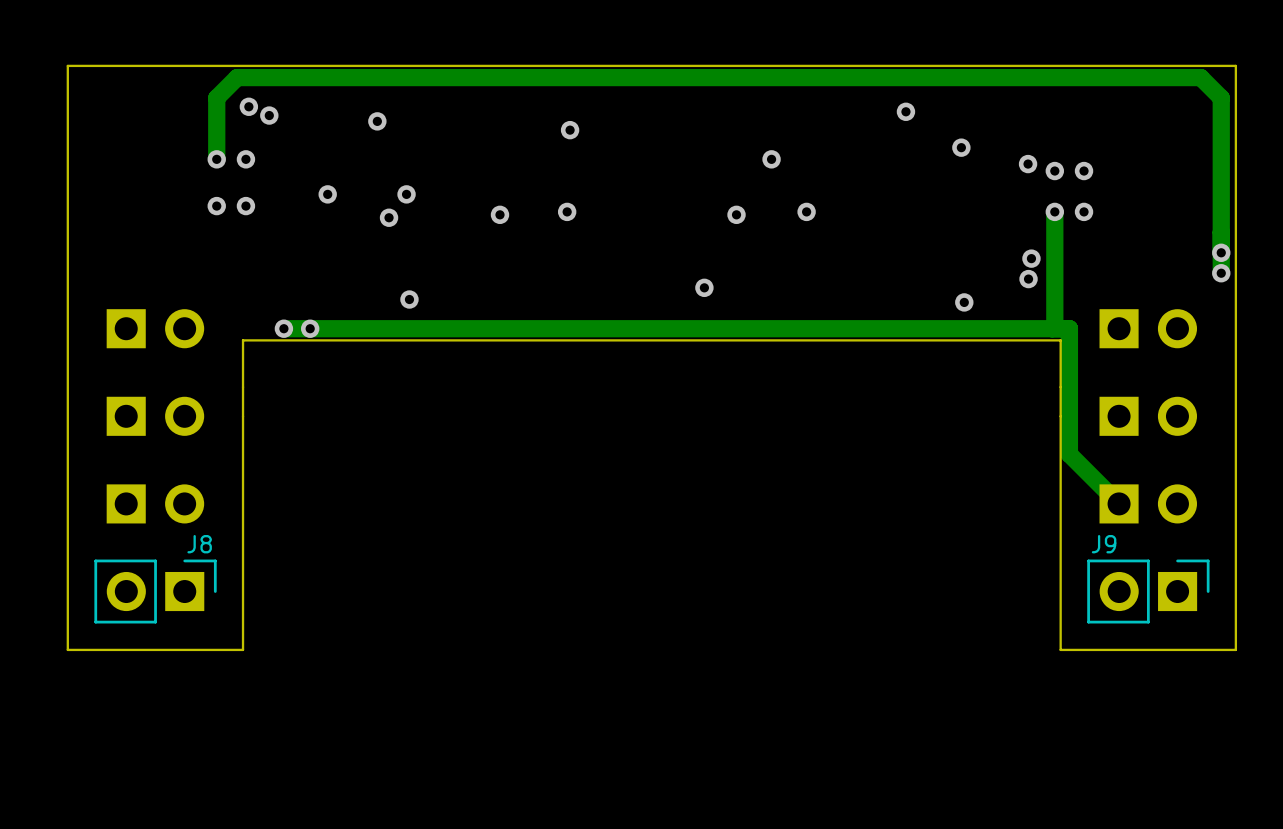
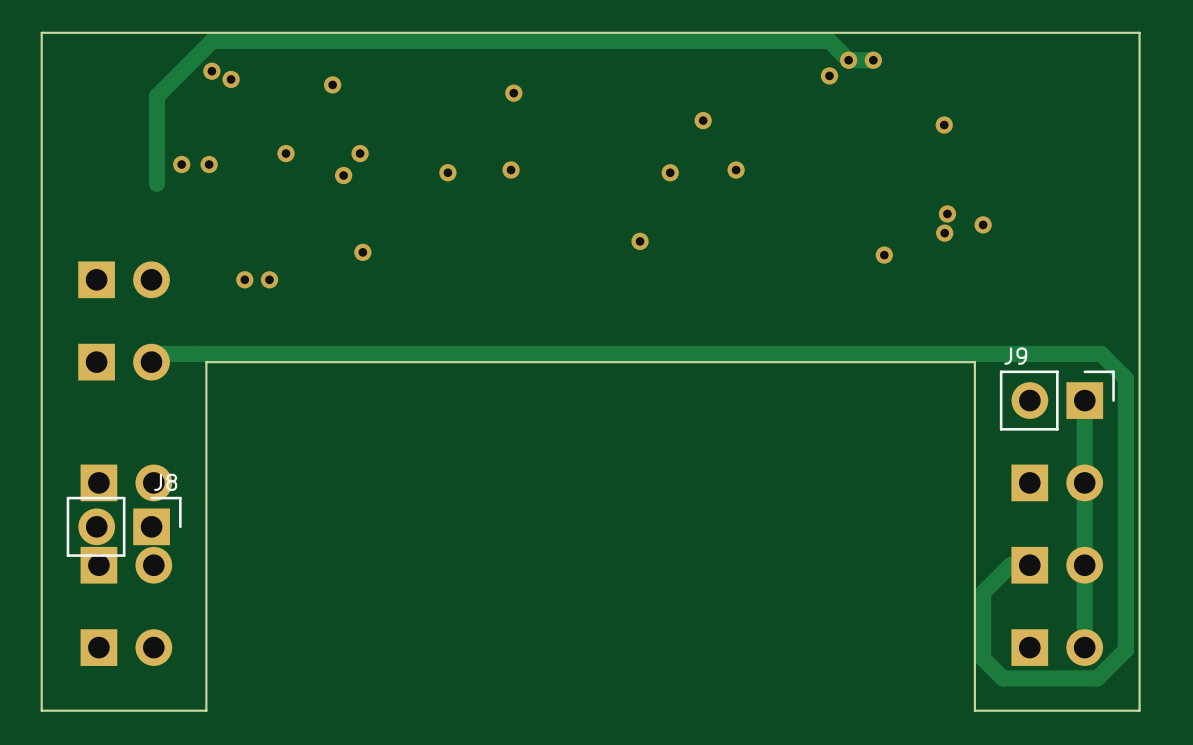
via: none -> (848, 60)
track: none -> (873, 60) (848, 60) (829, 40) (212, 40) (156, 96) (156, 183)
via: none -> (873, 60)
via: (961, 147) -> none
track: (216, 159) (216, 98) (237, 77) (1200, 77) (1221, 98) (1221, 273) -> none
via: (216, 159) -> none
via: (245, 159) -> none
via: (1054, 171) -> none
via: (1084, 171) -> none
track: (1054, 211) (1054, 325) (1051, 328) -> none
via: (1054, 211) -> none
via: (1084, 211) -> none
via: (1221, 252) -> none
via: none -> (983, 224)
via: (1221, 273) -> none
track: (283, 328) (1069, 328) (1069, 454) (1119, 503) -> none
part: (1148, 328) -> none
track: none -> (146, 353) (1101, 353) (1125, 378) (1125, 649) (1097, 678) (1002, 678) (983, 658) (983, 592) (1010, 565) (1029, 565)
board edge: (1060, 416) (1060, 340) (243, 340) (243, 416) -> (974, 362) (206, 362)
part: (1148, 416) -> none
track: none -> (1084, 400) (1084, 647)
part position: (155, 503) -> (126, 482)
part position: (1148, 503) -> (1057, 482)
J9 position: (1148, 591) -> (1057, 400)
part: none -> (126, 565)
part: none -> (1057, 565)
board edge: (243, 649) (67, 649) -> (206, 581) (206, 710) (41, 710) (41, 581)
board edge: (1235, 649) (1060, 649) -> (1139, 581) (1139, 710) (974, 710) (974, 581)
part: none -> (126, 647)
part: none -> (1057, 647)

